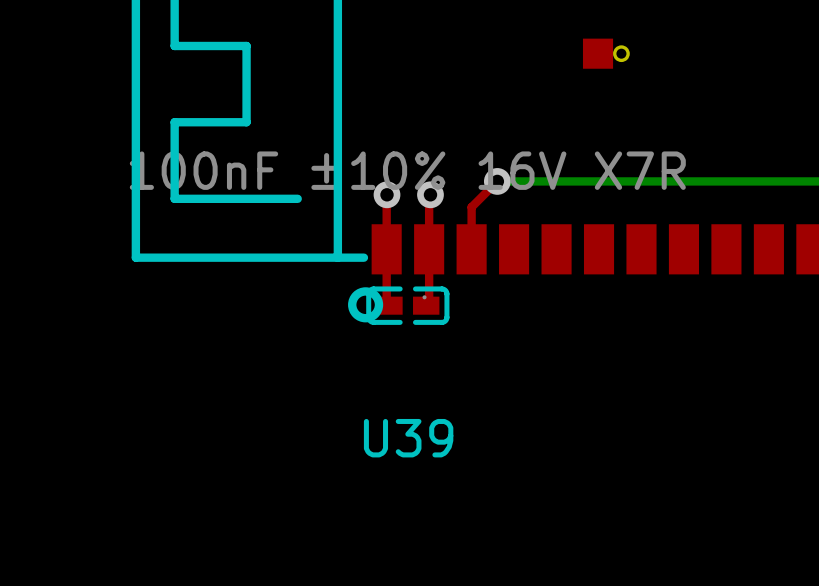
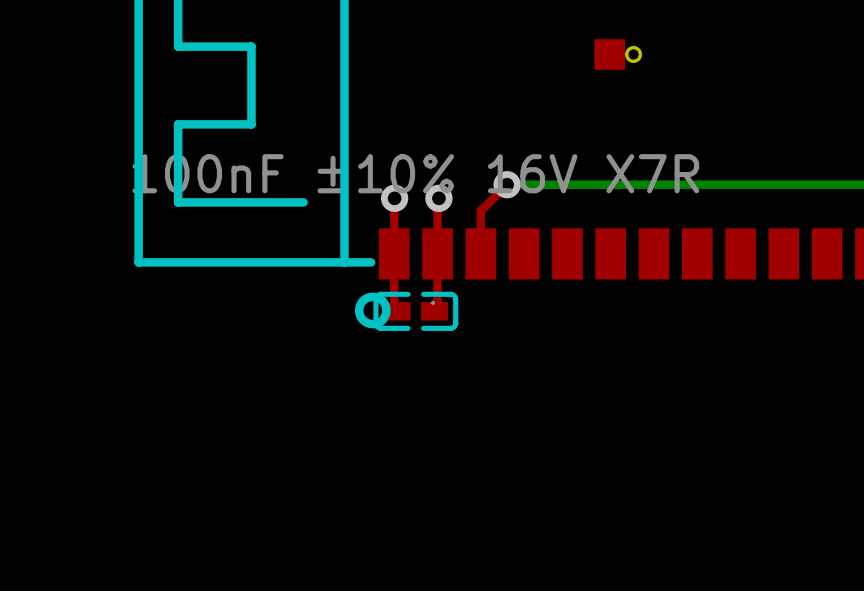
U39 name: U39 (408, 438) -> none

